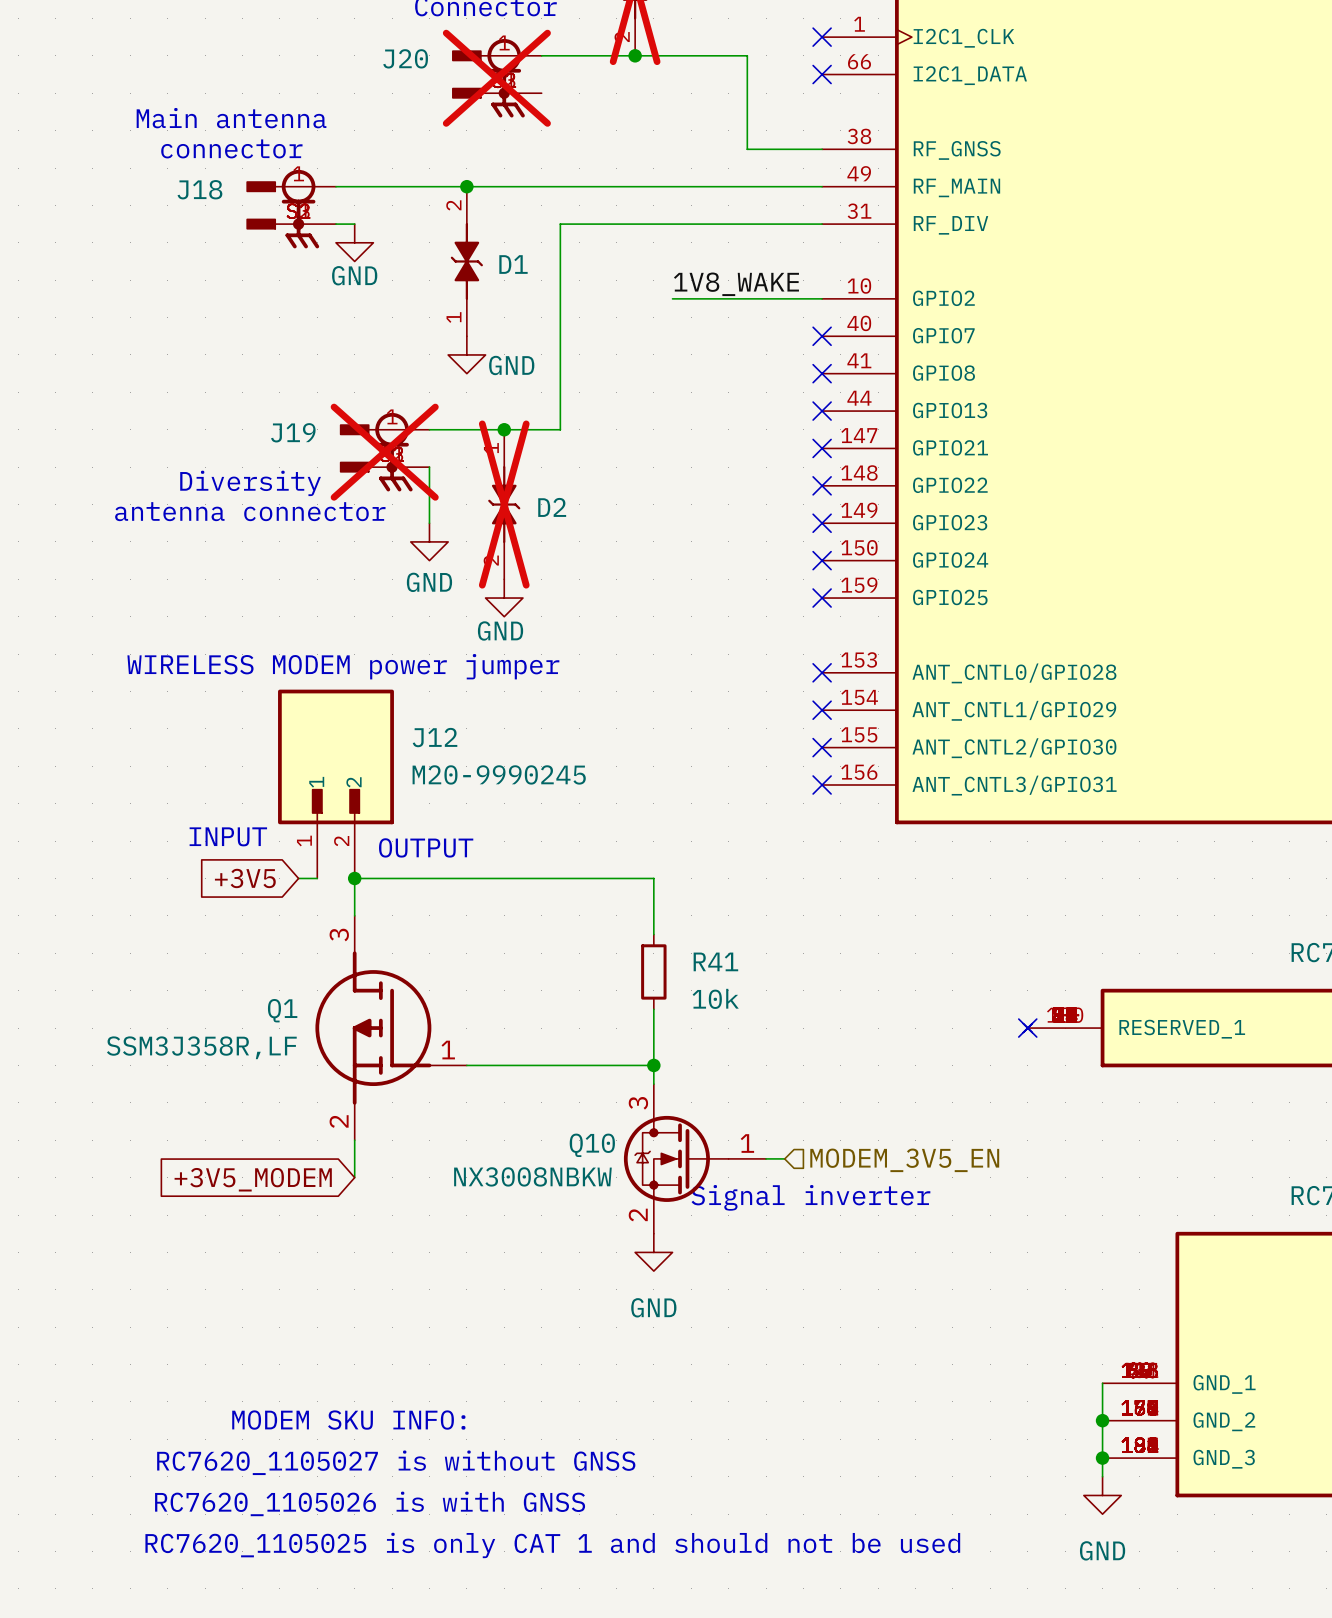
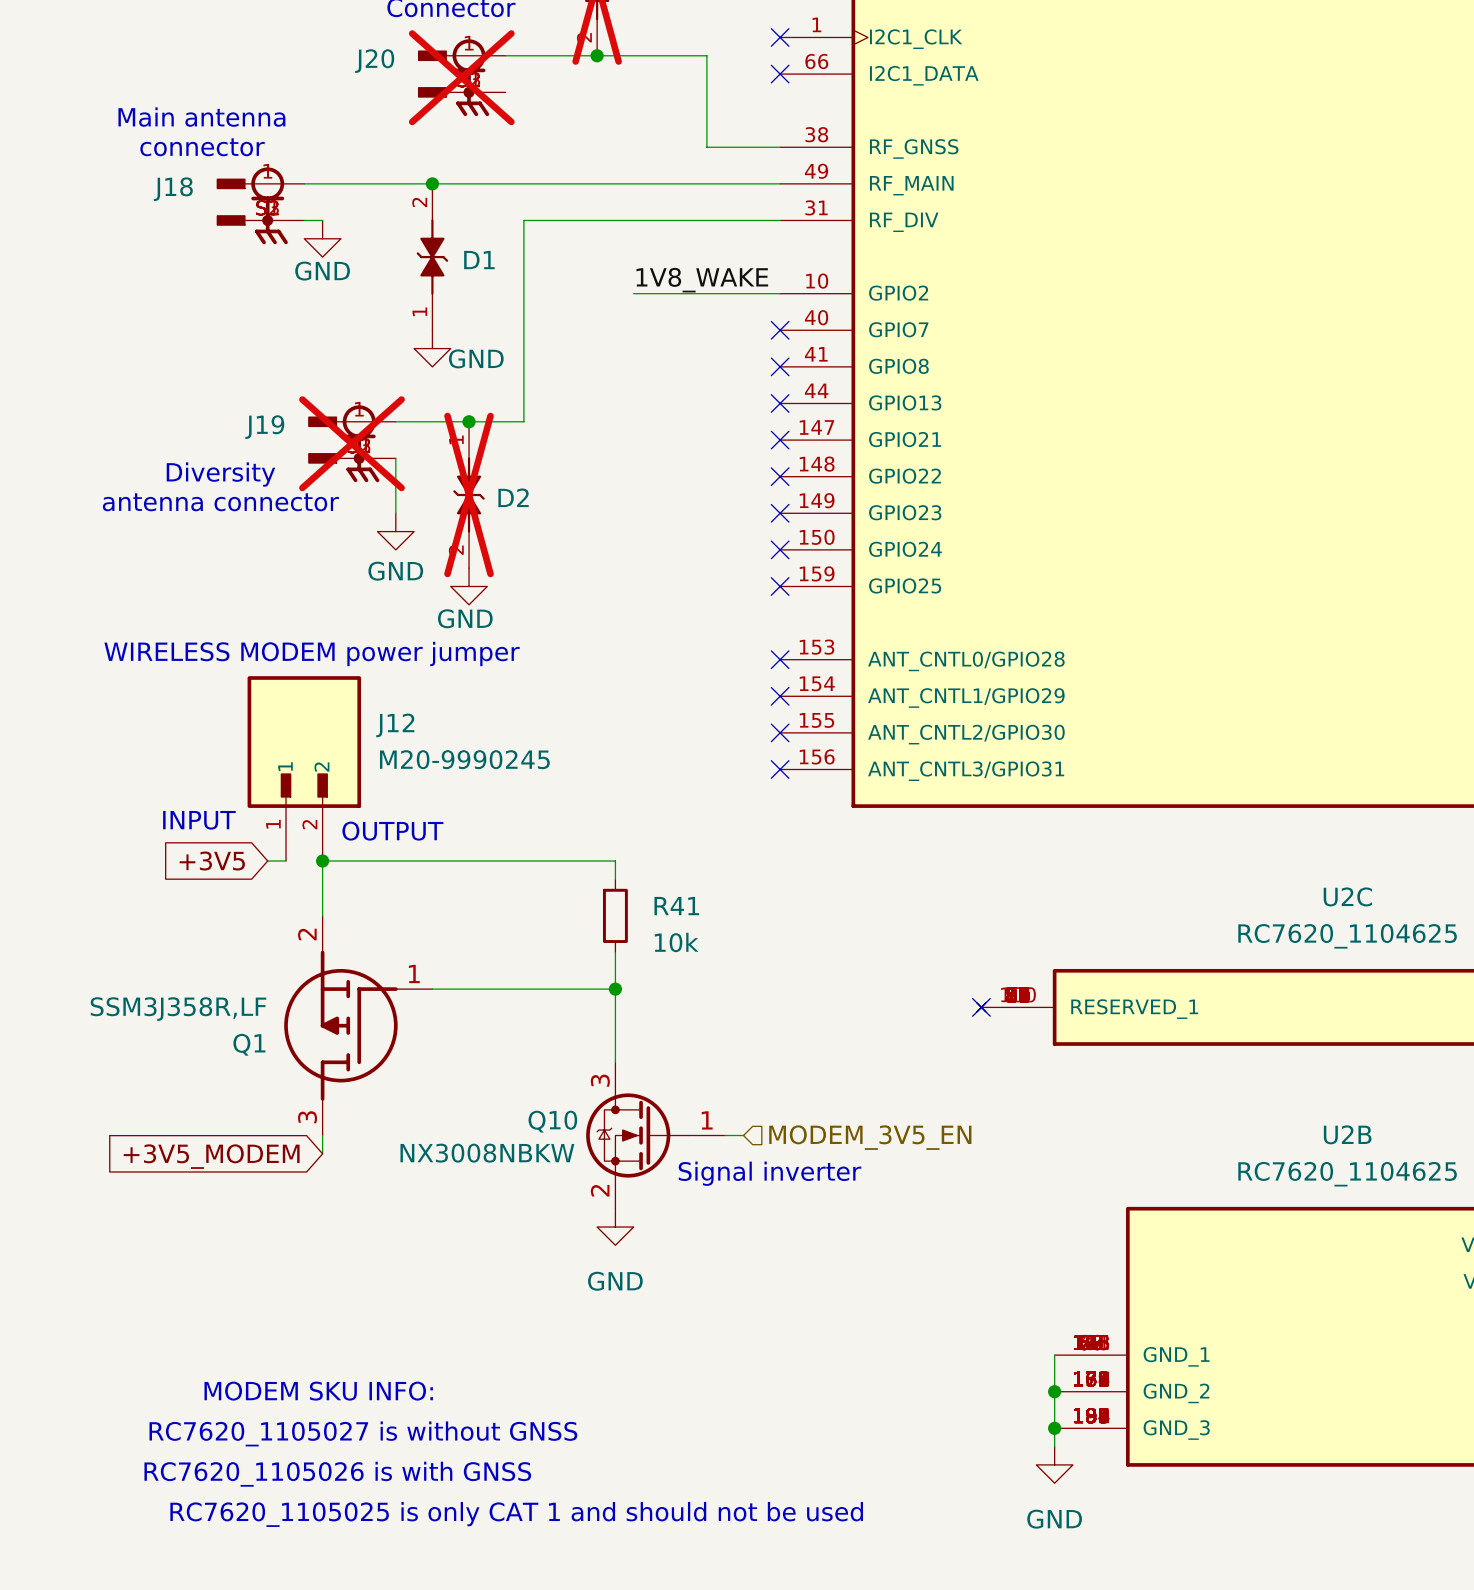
wire: (653, 897) (653, 934) -> none
wire: none -> (615, 952) (615, 989) (432, 989)
R41 position: (653, 971) -> (615, 915)
Q1 flip: as is (373, 1028) -> up-down (340, 1025)
wire: (466, 1065) (653, 1065) -> none
junction position: (653, 1065) -> (615, 989)

